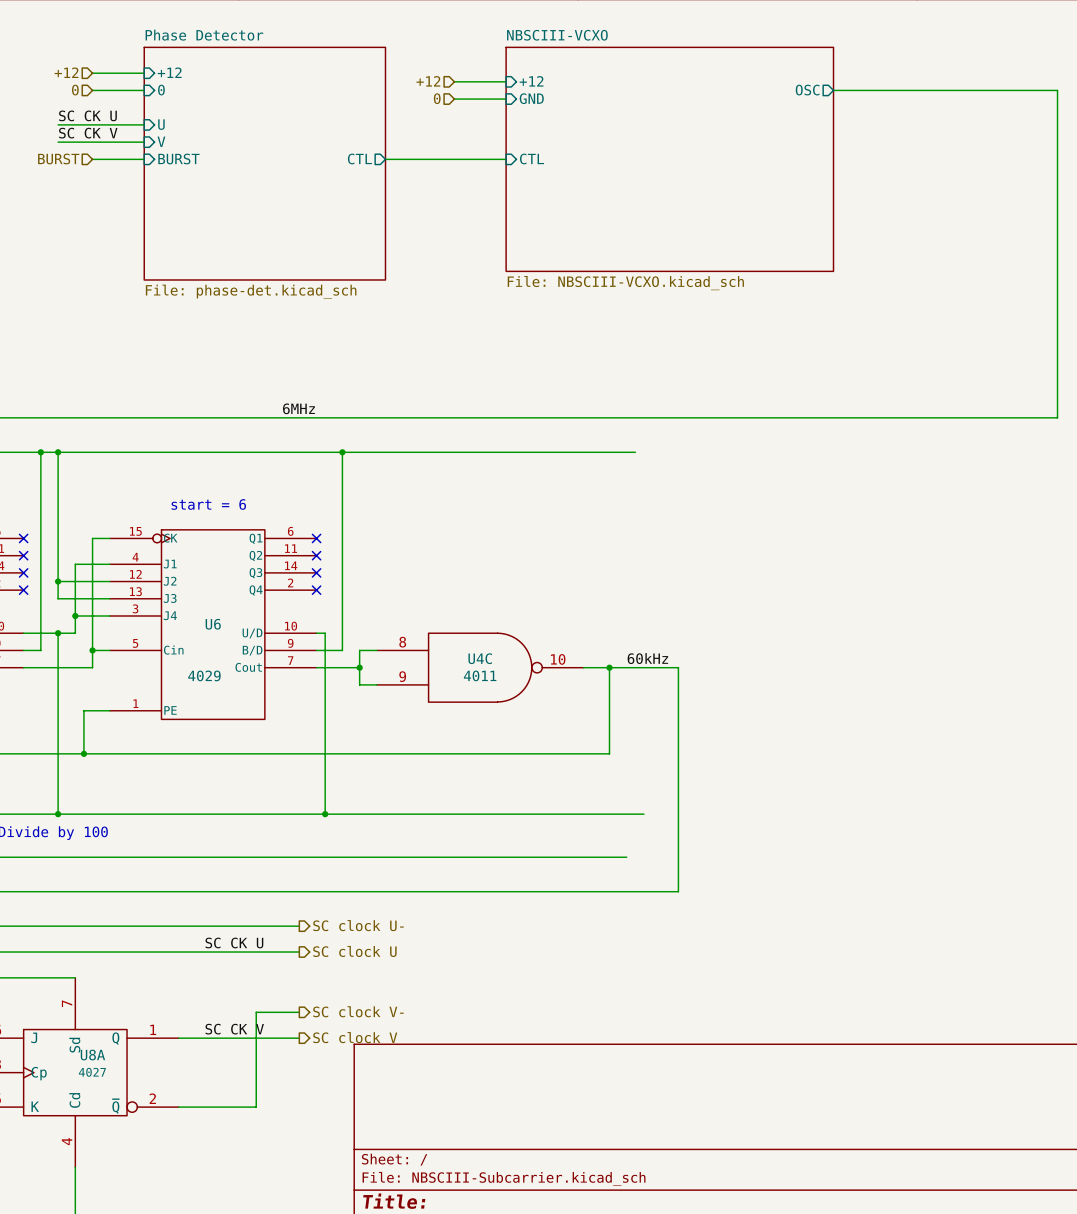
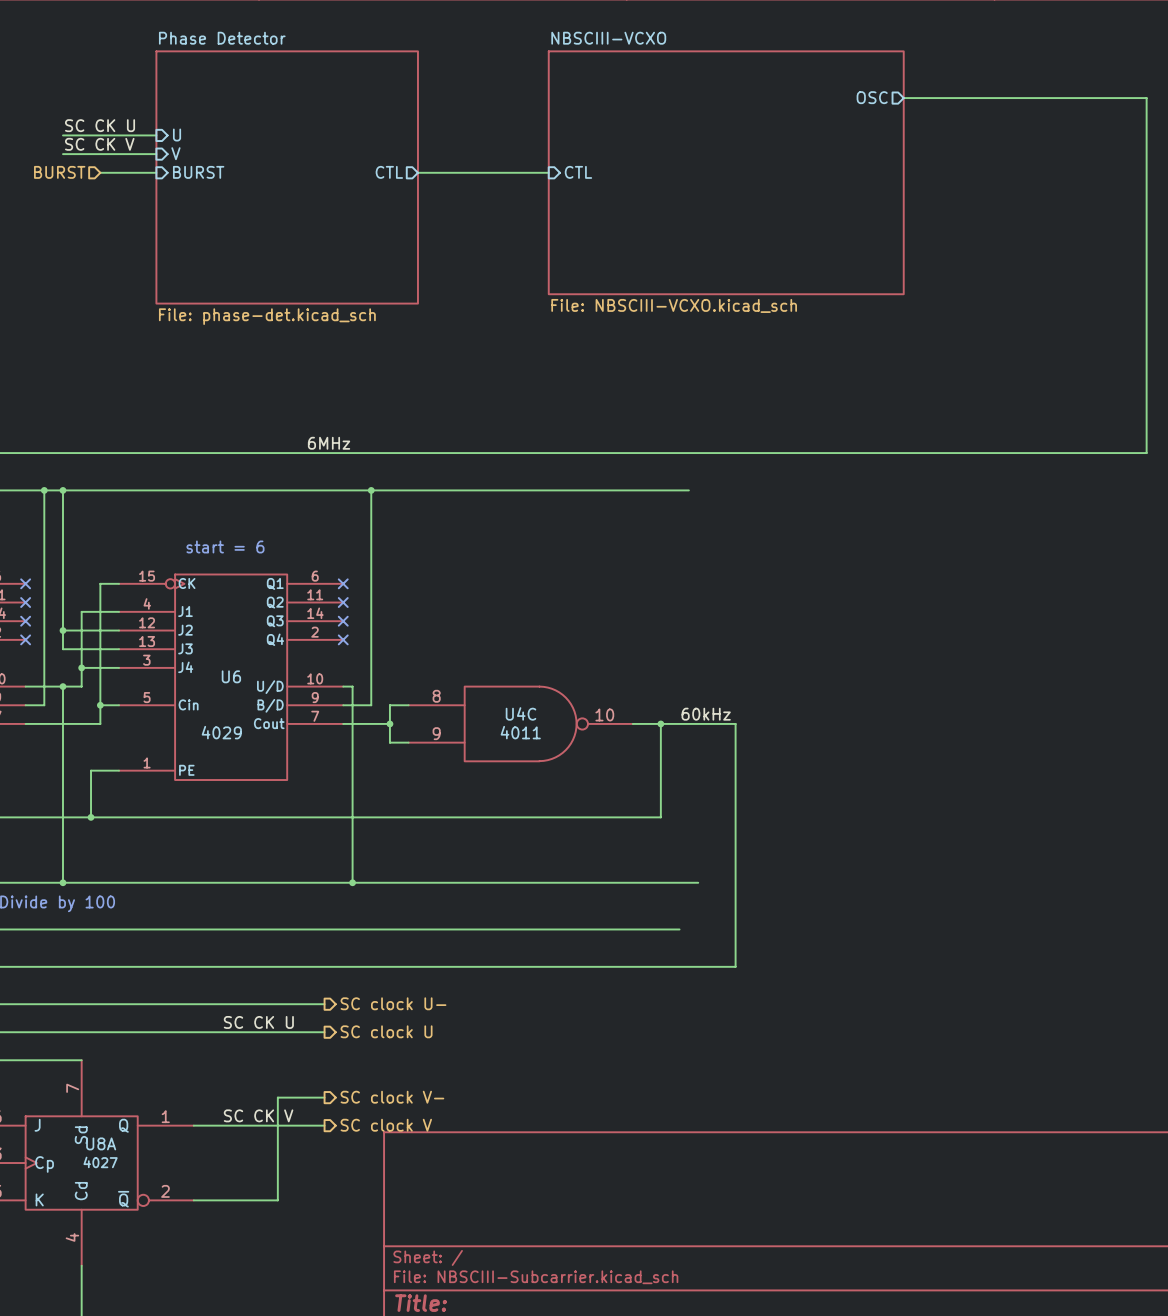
hierarchical label: +12 (66, 72) -> none
sheet pin: +12 (169, 72) -> none
wire: (92, 73) (144, 73) -> none
hierarchical label: +12 (428, 81) -> none
wire: (454, 81) (506, 81) -> none
sheet pin: +12 (531, 81) -> none
hierarchical label: 0 (75, 90) -> none
wire: (92, 90) (144, 90) -> none
sheet pin: 0 (161, 90) -> none
hierarchical label: 0 (437, 98) -> none
sheet pin: GND (531, 98) -> none
wire: (454, 99) (506, 99) -> none

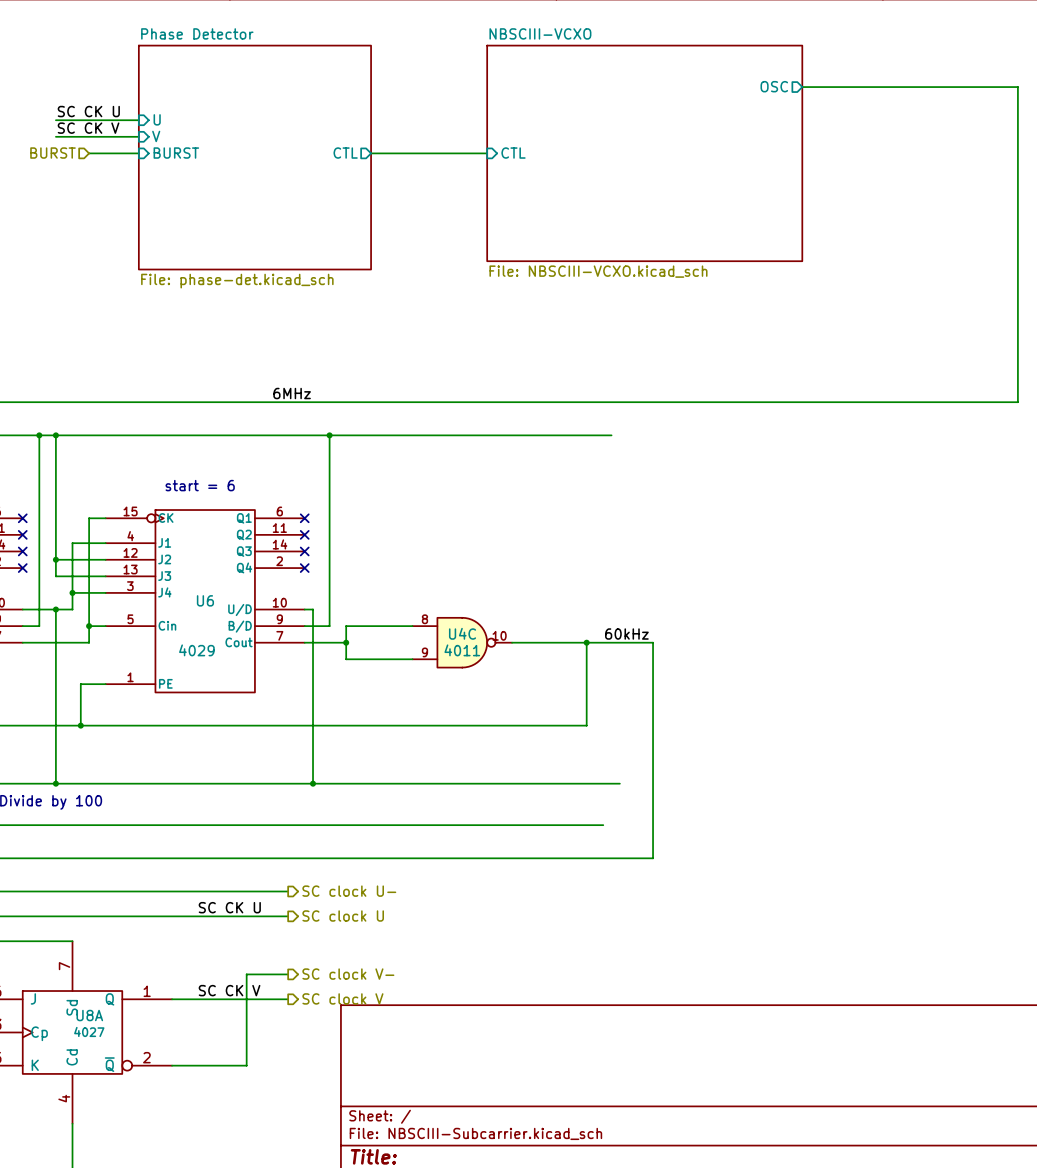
U4C symbol: [408, 686, 633, 762] -> [412, 616, 513, 669]

